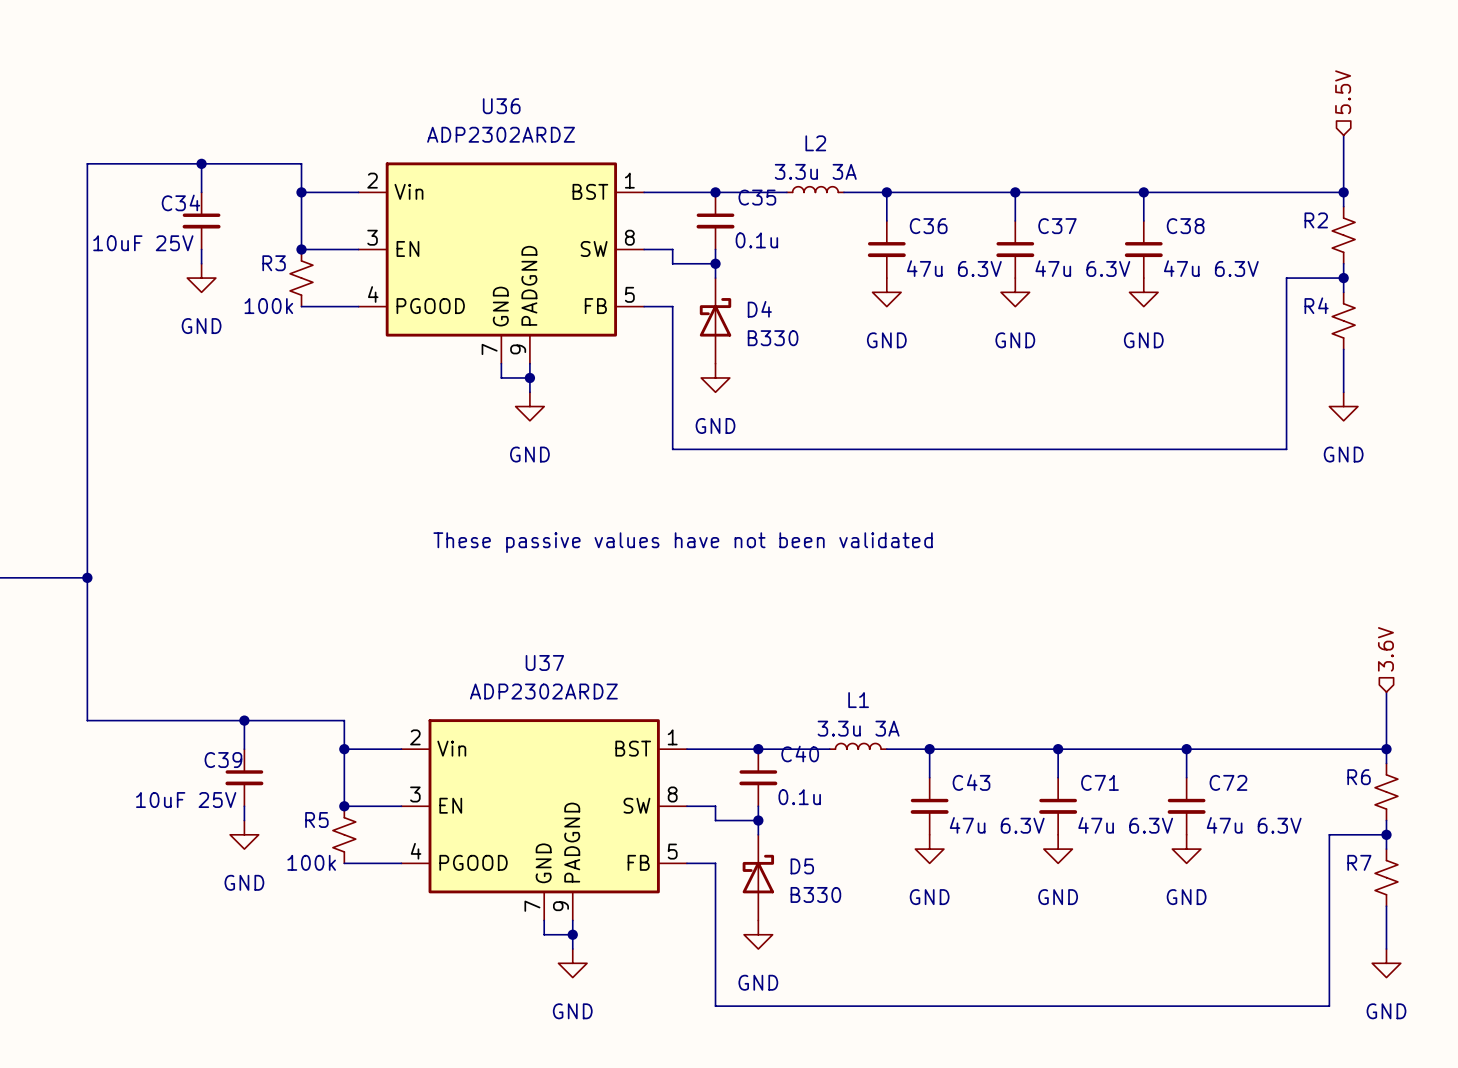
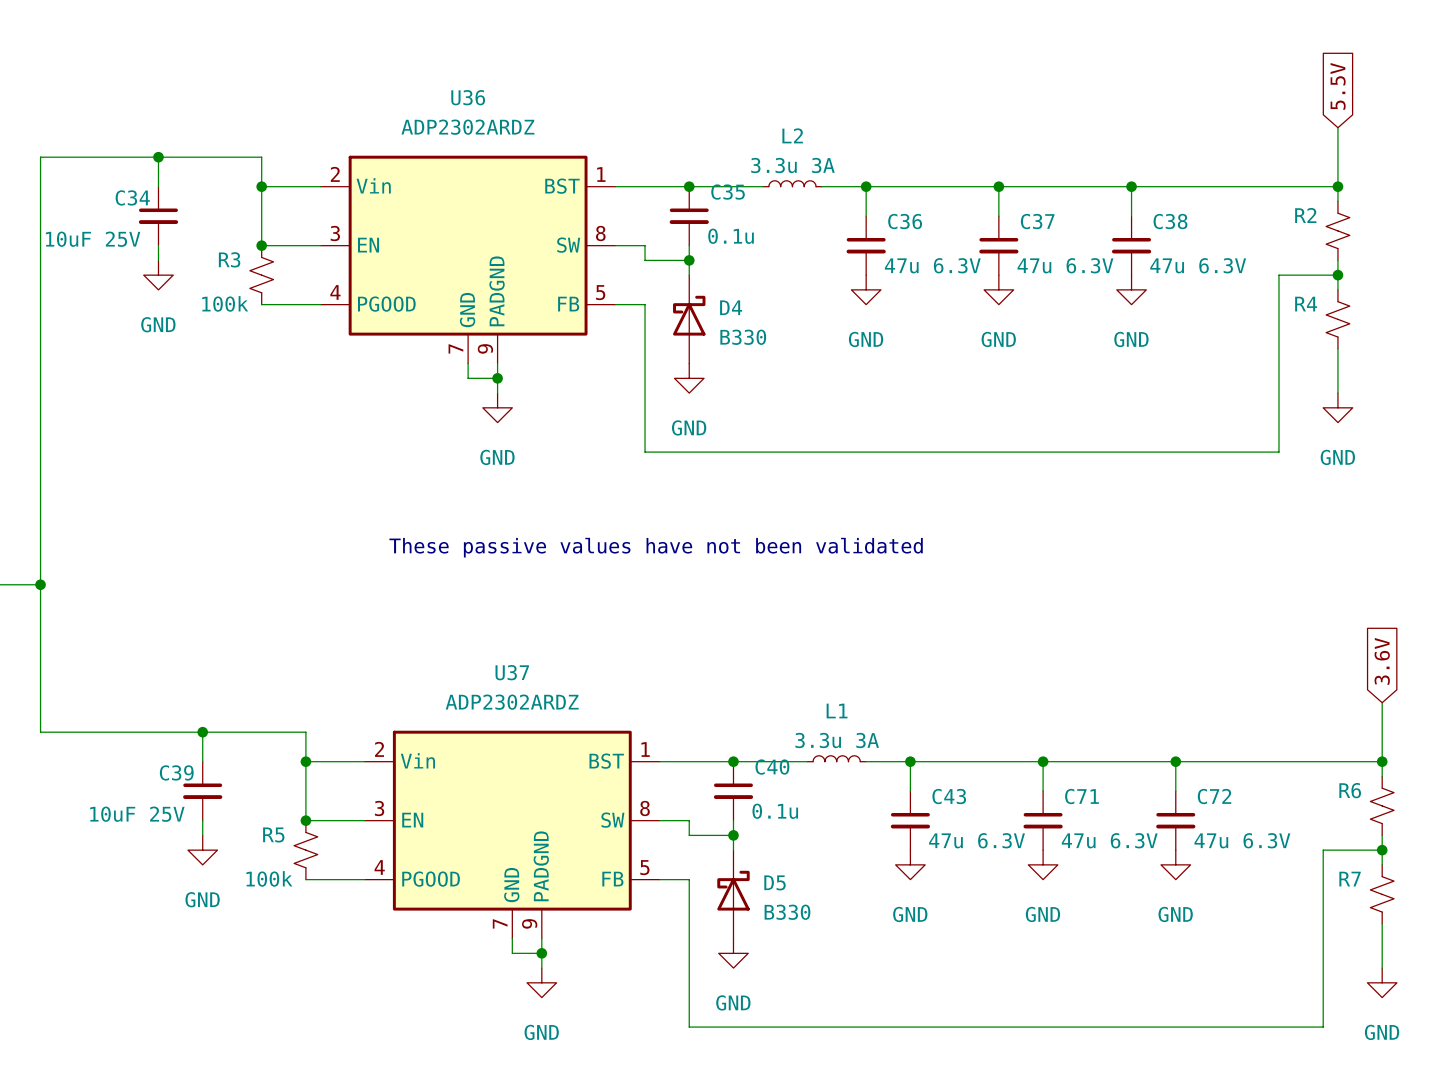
hierarchical label: 5.5V (1343, 92) -> none
global label: none -> 5.5V (1338, 86)
hierarchical label: 3.6V (1385, 649) -> none
global label: none -> 3.6V (1382, 661)

